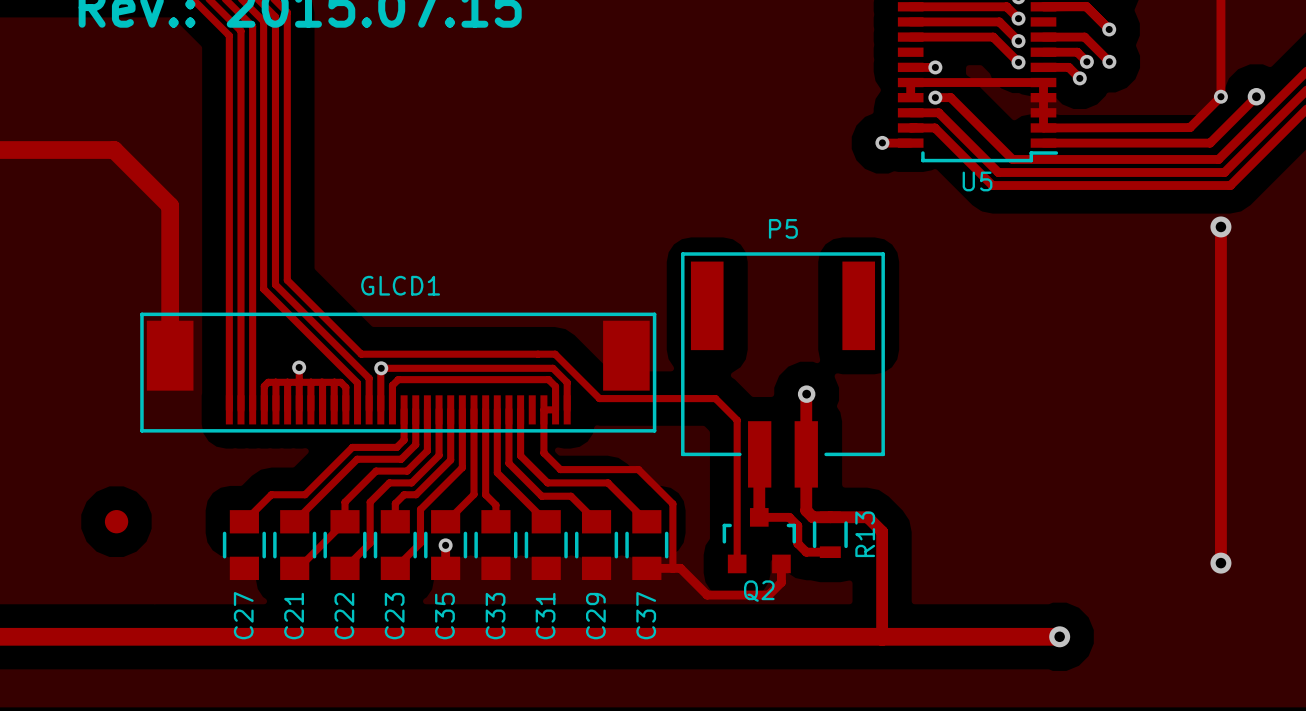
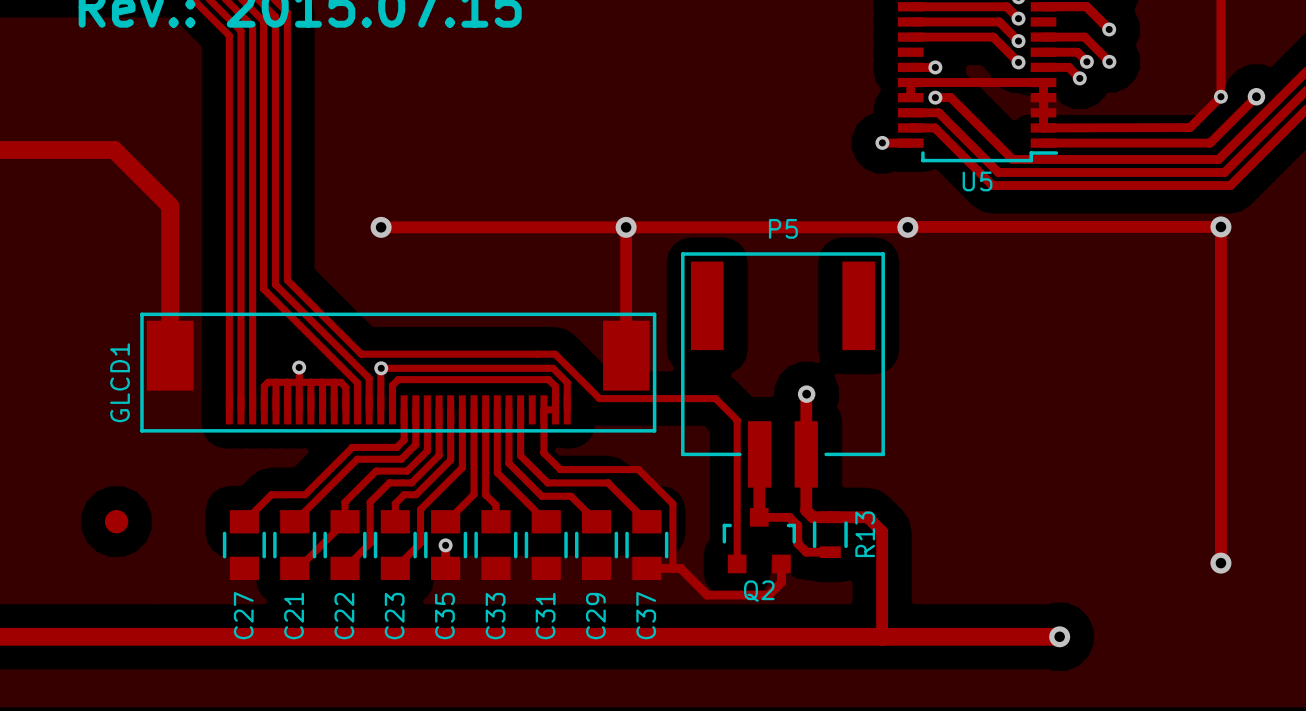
track: none -> (1220, 226) (381, 227)
via: none -> (381, 227)
track: none -> (626, 227) (626, 355)
via: none -> (626, 227)
via: none -> (907, 227)
GLCD1 name rotation: 0° (400, 285) -> 90° counterclockwise (120, 382)
GLCD1 name position: GLCD1 (400, 285) -> GLCD1 (120, 382)

